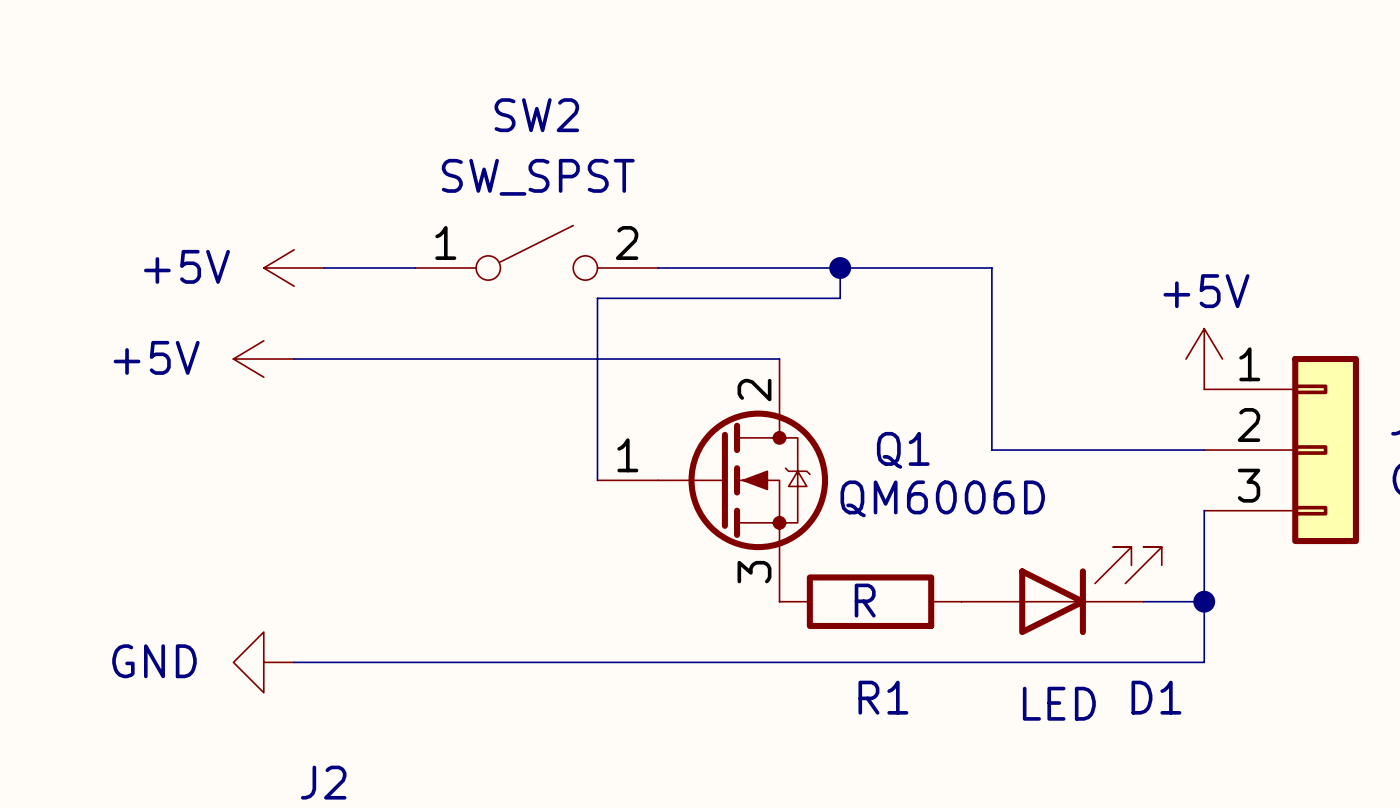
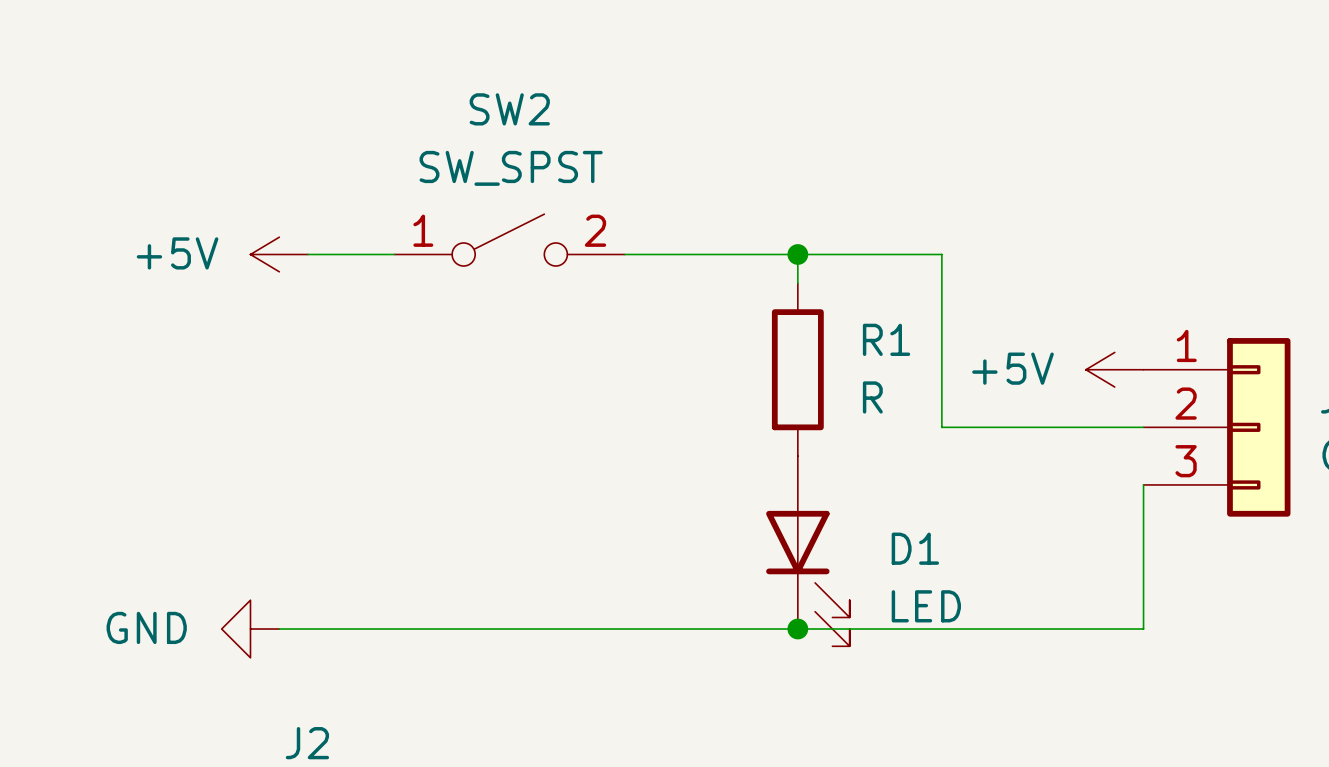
power symbol text position: +5V (1206, 291) -> +5V (1013, 368)
wire: (840, 298) (597, 298) (597, 480) -> none
power symbol: +5V (263, 359) -> none
wire: (294, 359) (779, 359) -> none
power symbol rotation: 0° (1204, 359) -> 90° counterclockwise (1114, 369)
power symbol position: +5V (1204, 359) -> +5V (1114, 369)
Q1: QM6006D (712, 480) -> none
D1 position: (1061, 591) -> (807, 551)
D1 rotation: 0° (1090, 591) -> 90° clockwise (807, 578)
R1 value position: R (865, 600) -> R (872, 397)
R1 rotation: 0° (870, 601) -> 90° clockwise (797, 369)
R1 position: (870, 601) -> (797, 369)
wire: (1143, 601) (1204, 601) -> none
junction: (1204, 601) -> none
junction: none -> (797, 629)
R1 name position: R1 (883, 697) -> R1 (886, 339)
D1 name position: D1 (1156, 697) -> D1 (915, 548)
D1 value position: LED (1059, 703) -> LED (926, 606)

